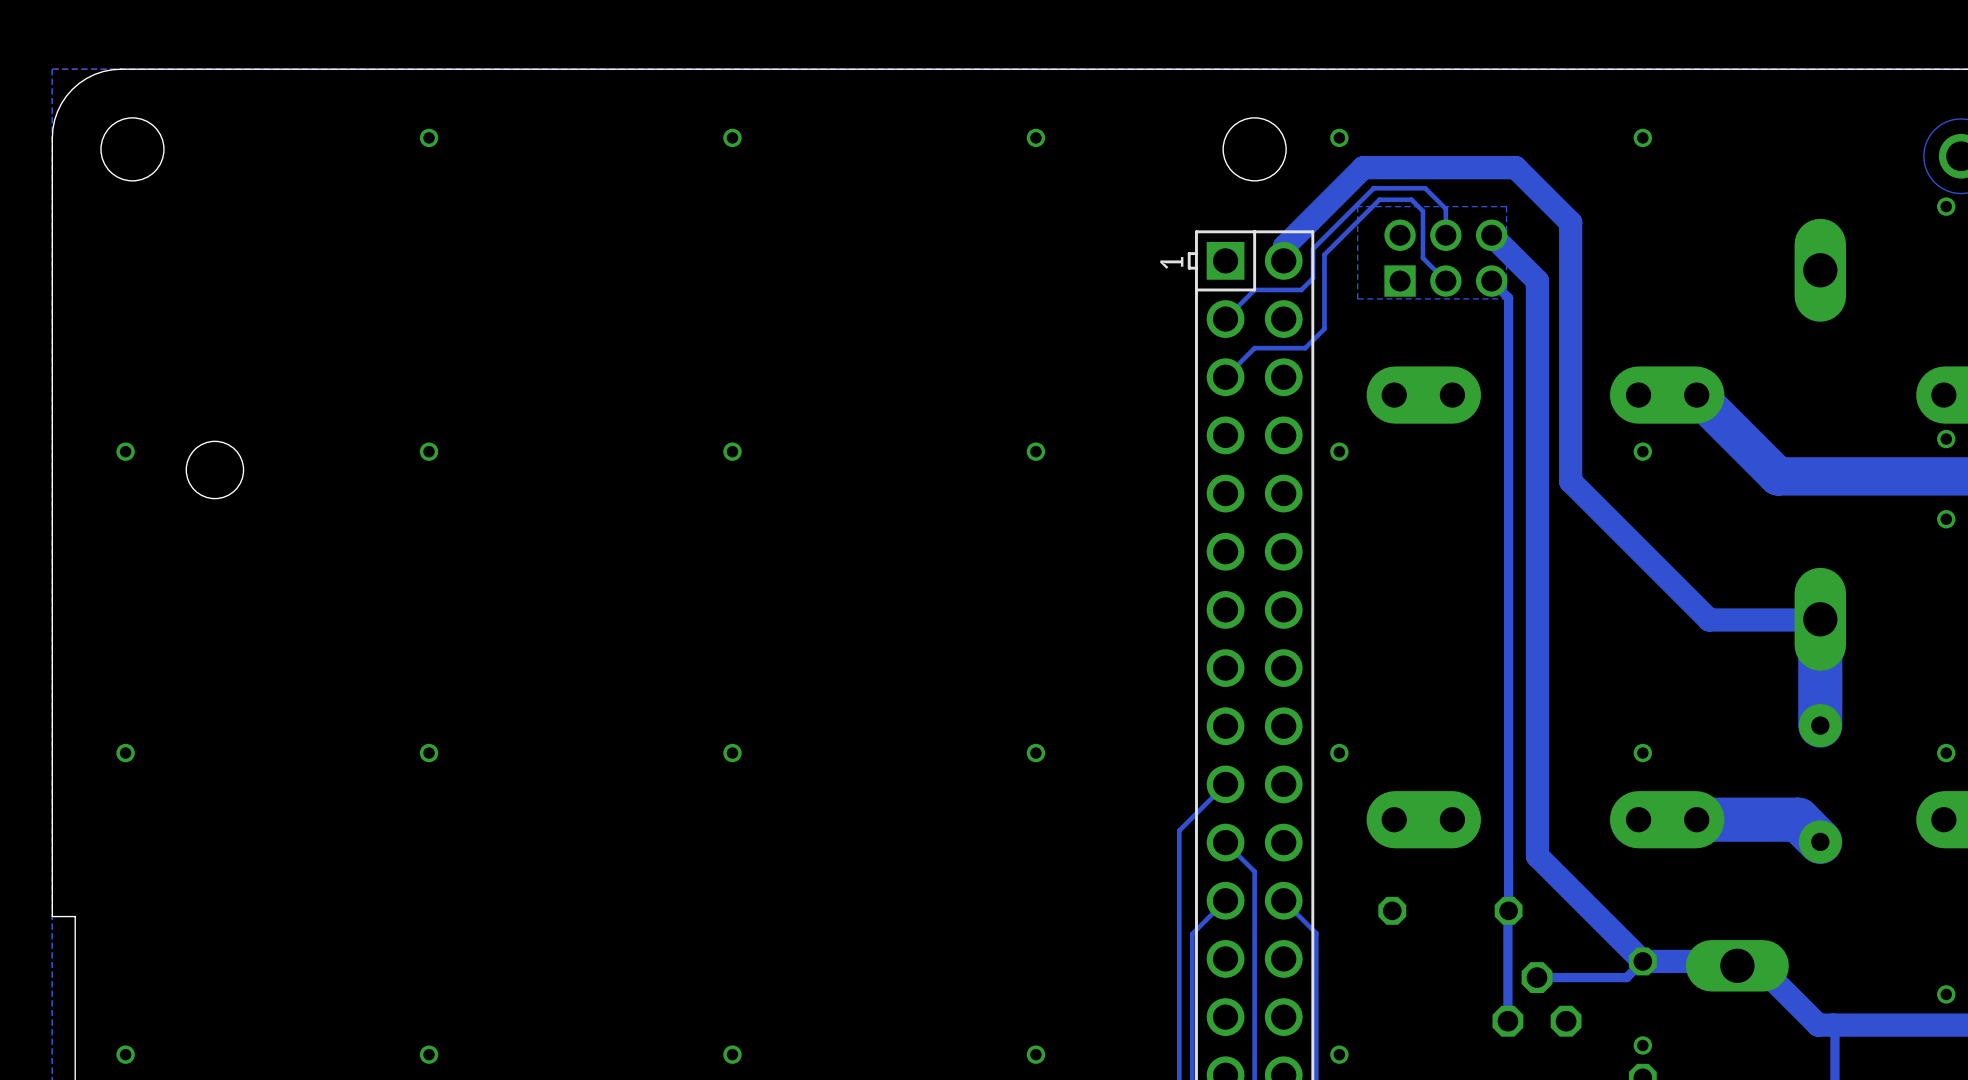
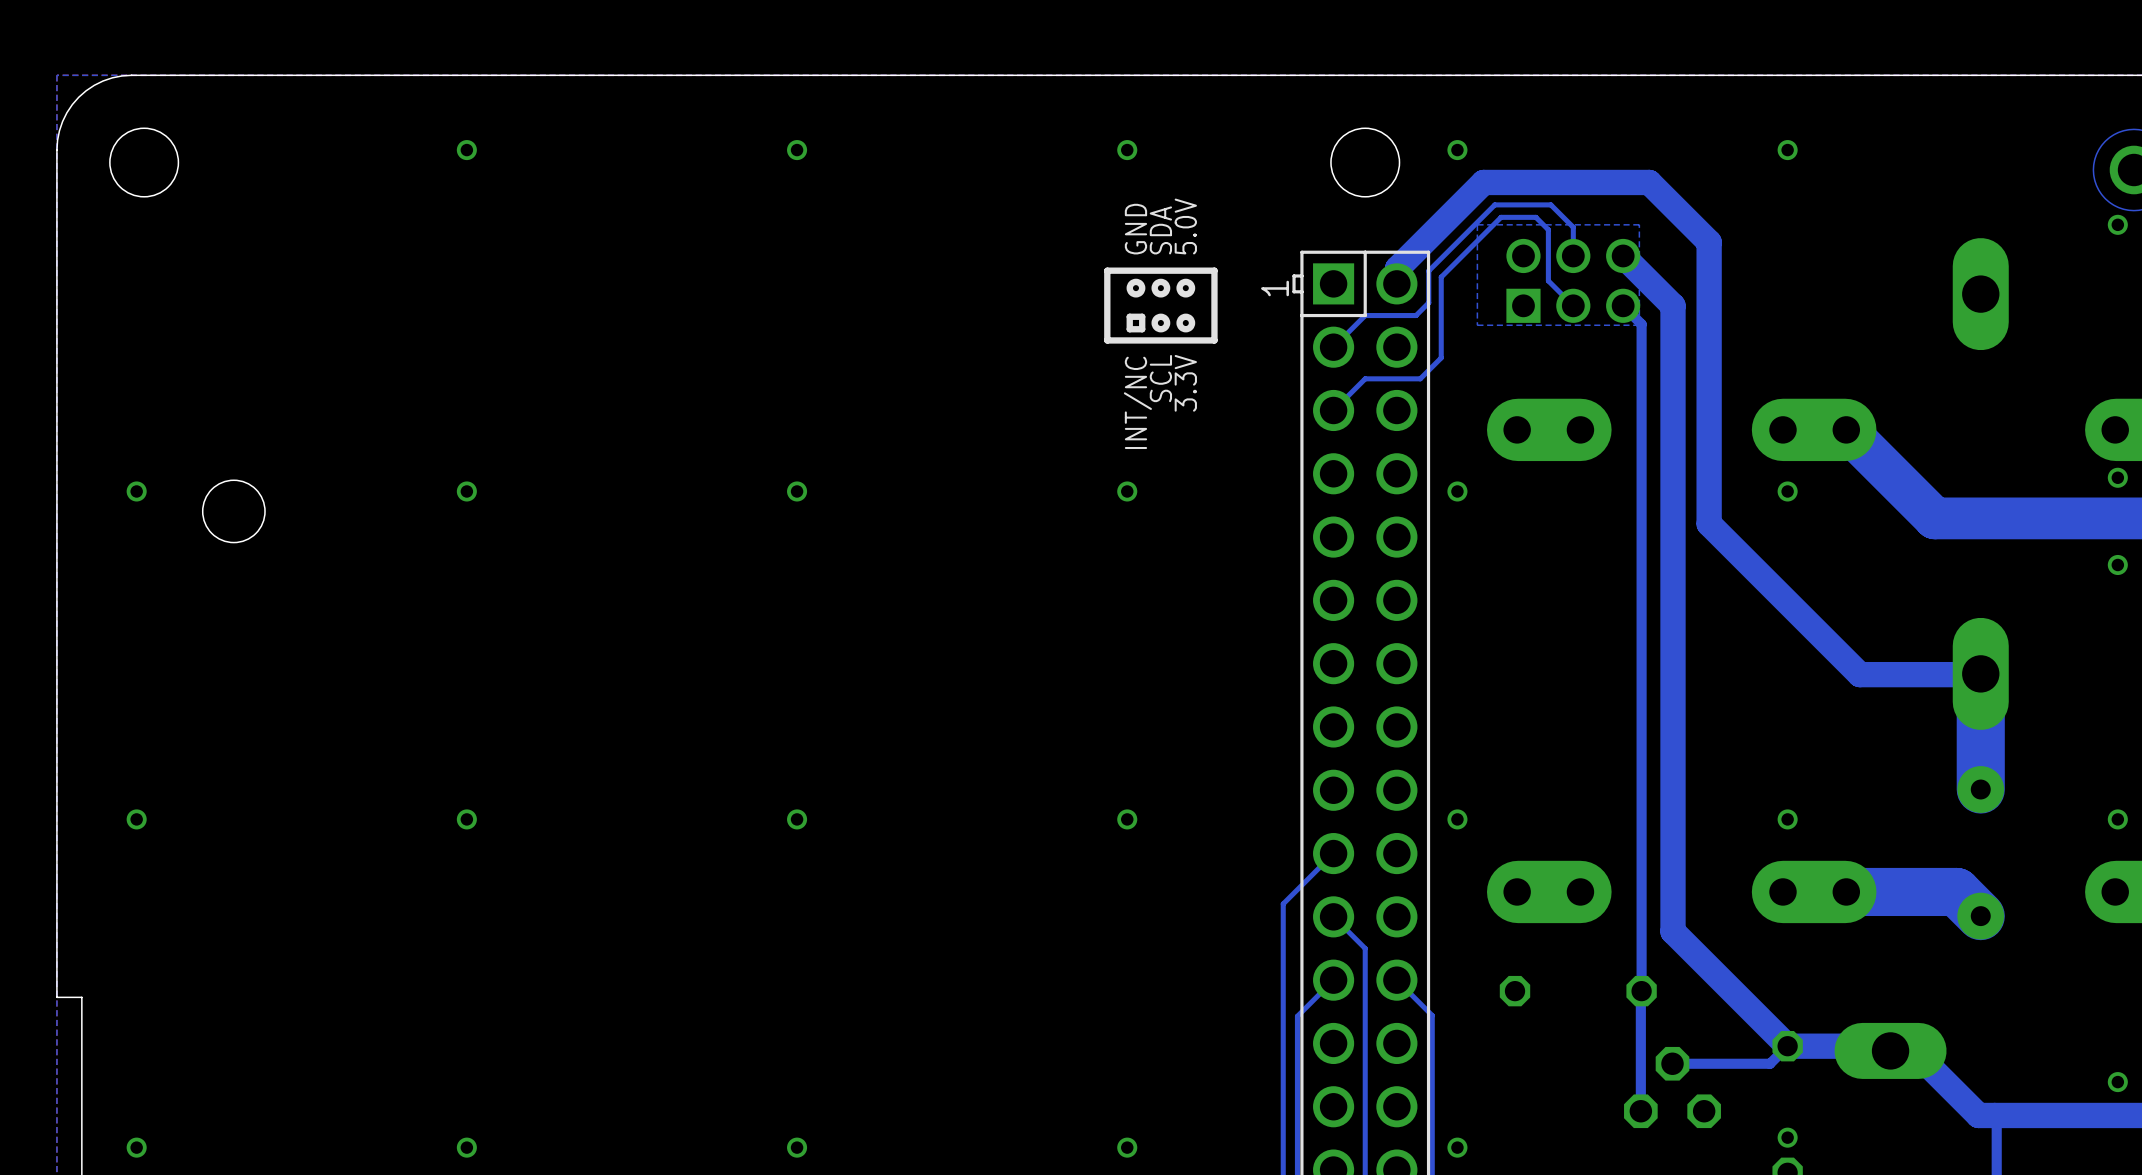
text: none -> 5.0V (1185, 226)
text: none -> GND (1135, 229)
text: none -> SDA (1160, 230)
line: none -> (1214, 270) (1107, 270) (1107, 340) (1214, 340) (1214, 270)
drawing: none -> [1126, 278, 1196, 333]
line: none -> (1142, 316) (1129, 316) (1129, 329) (1142, 329) (1142, 316)
text: none -> SCL (1160, 378)
text: none -> 3.3V (1185, 383)
text: none -> INT/NC (1137, 402)

